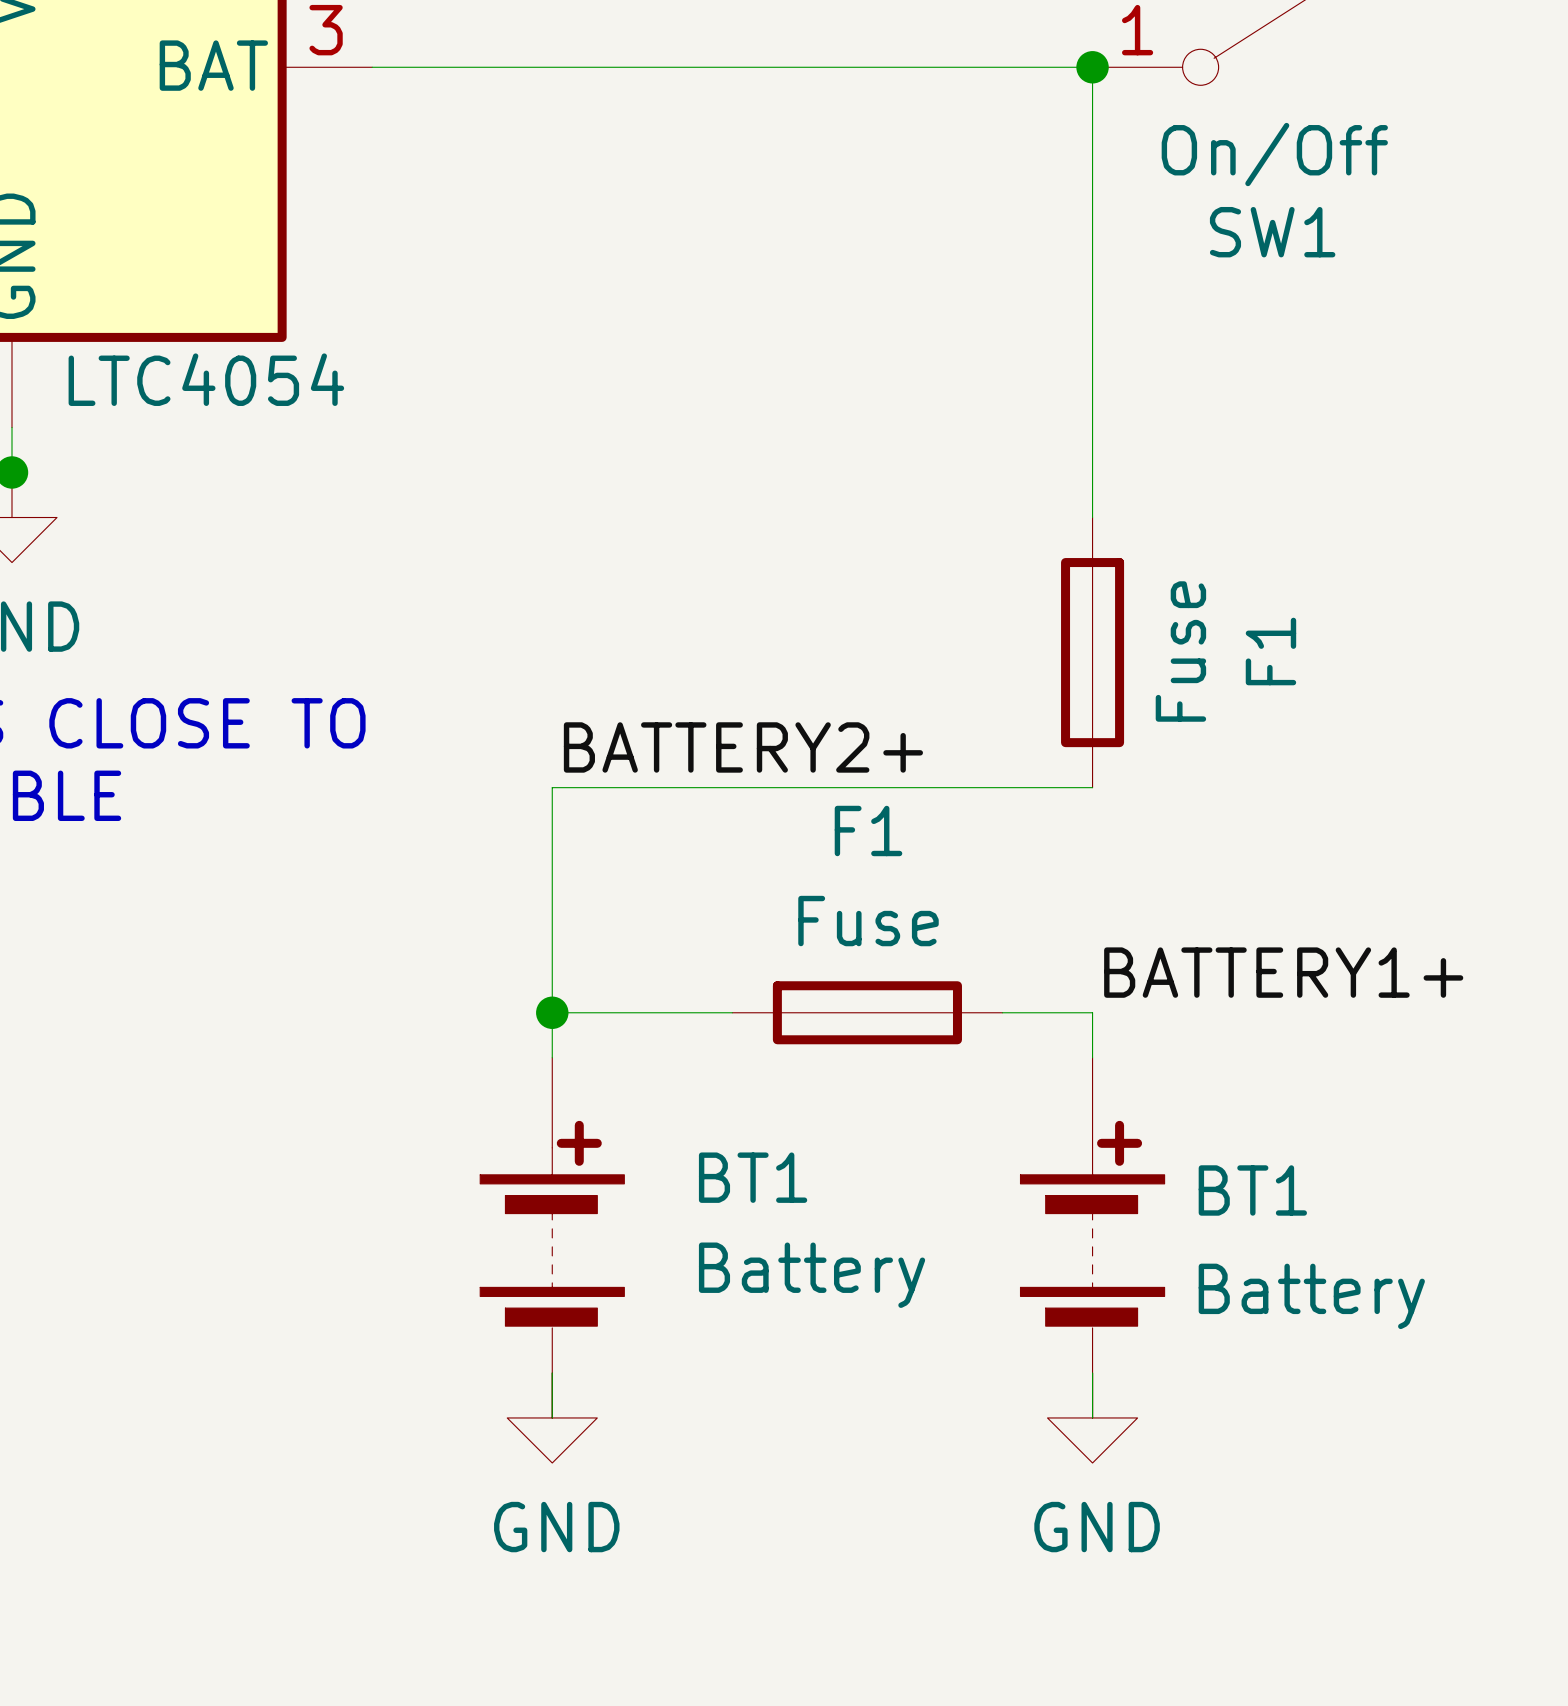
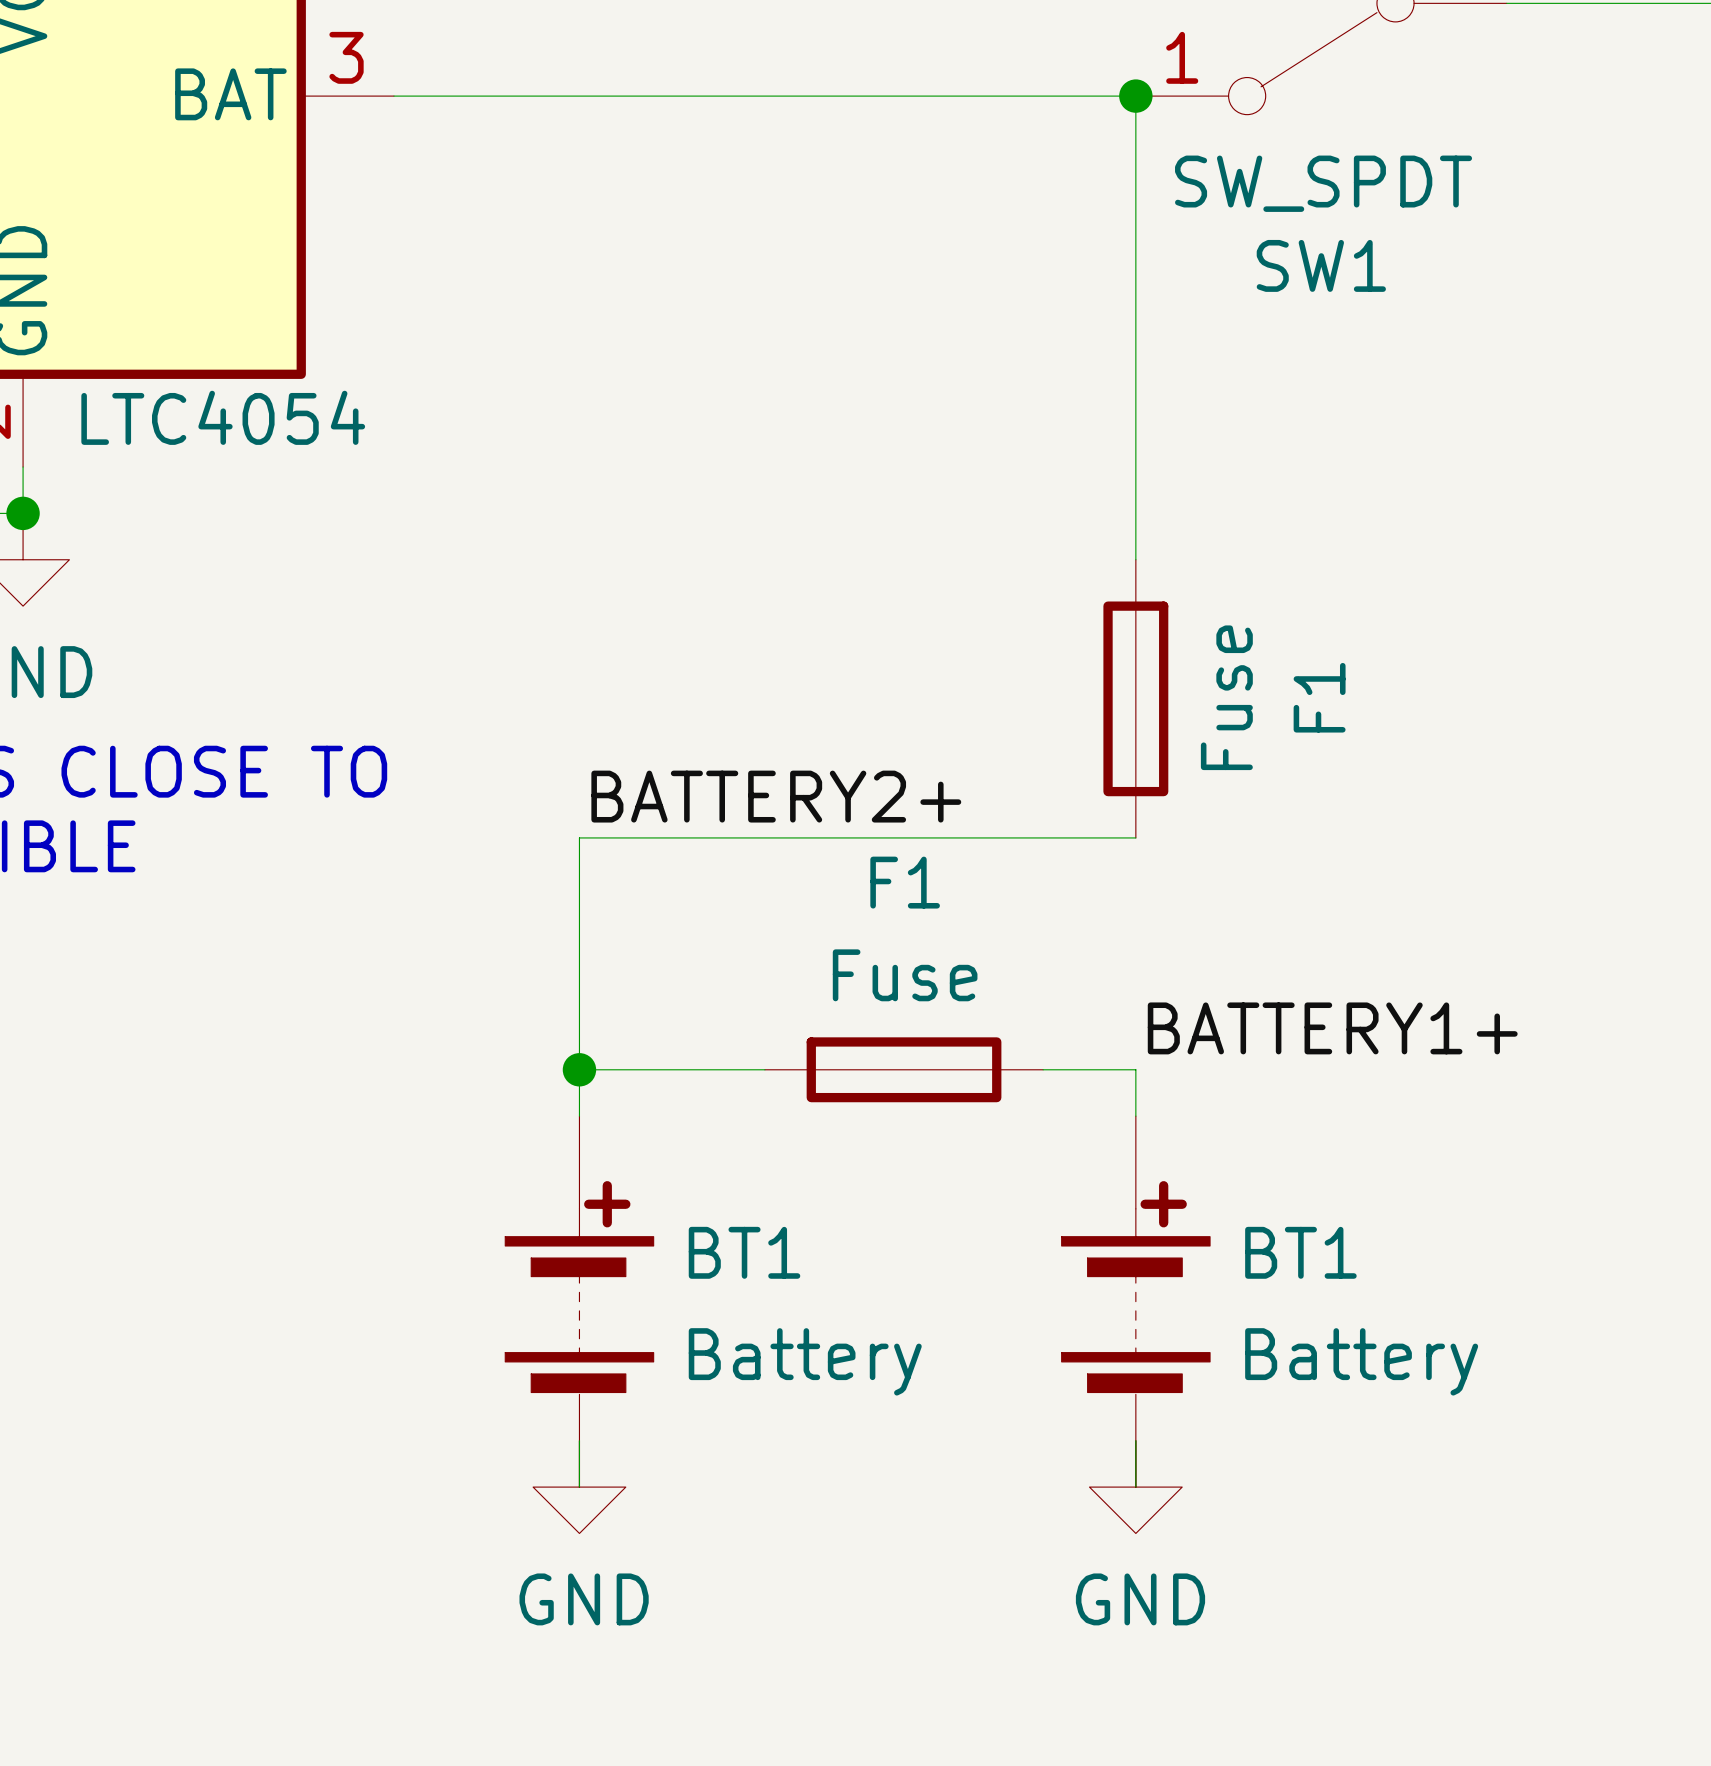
SW1 value: On/Off (1274, 154) -> SW_SPDT (1323, 183)
BT1 name position: BT1 (753, 1177) -> BT1 (744, 1252)
BT1 value position: Battery (812, 1275) -> Battery (805, 1361)

